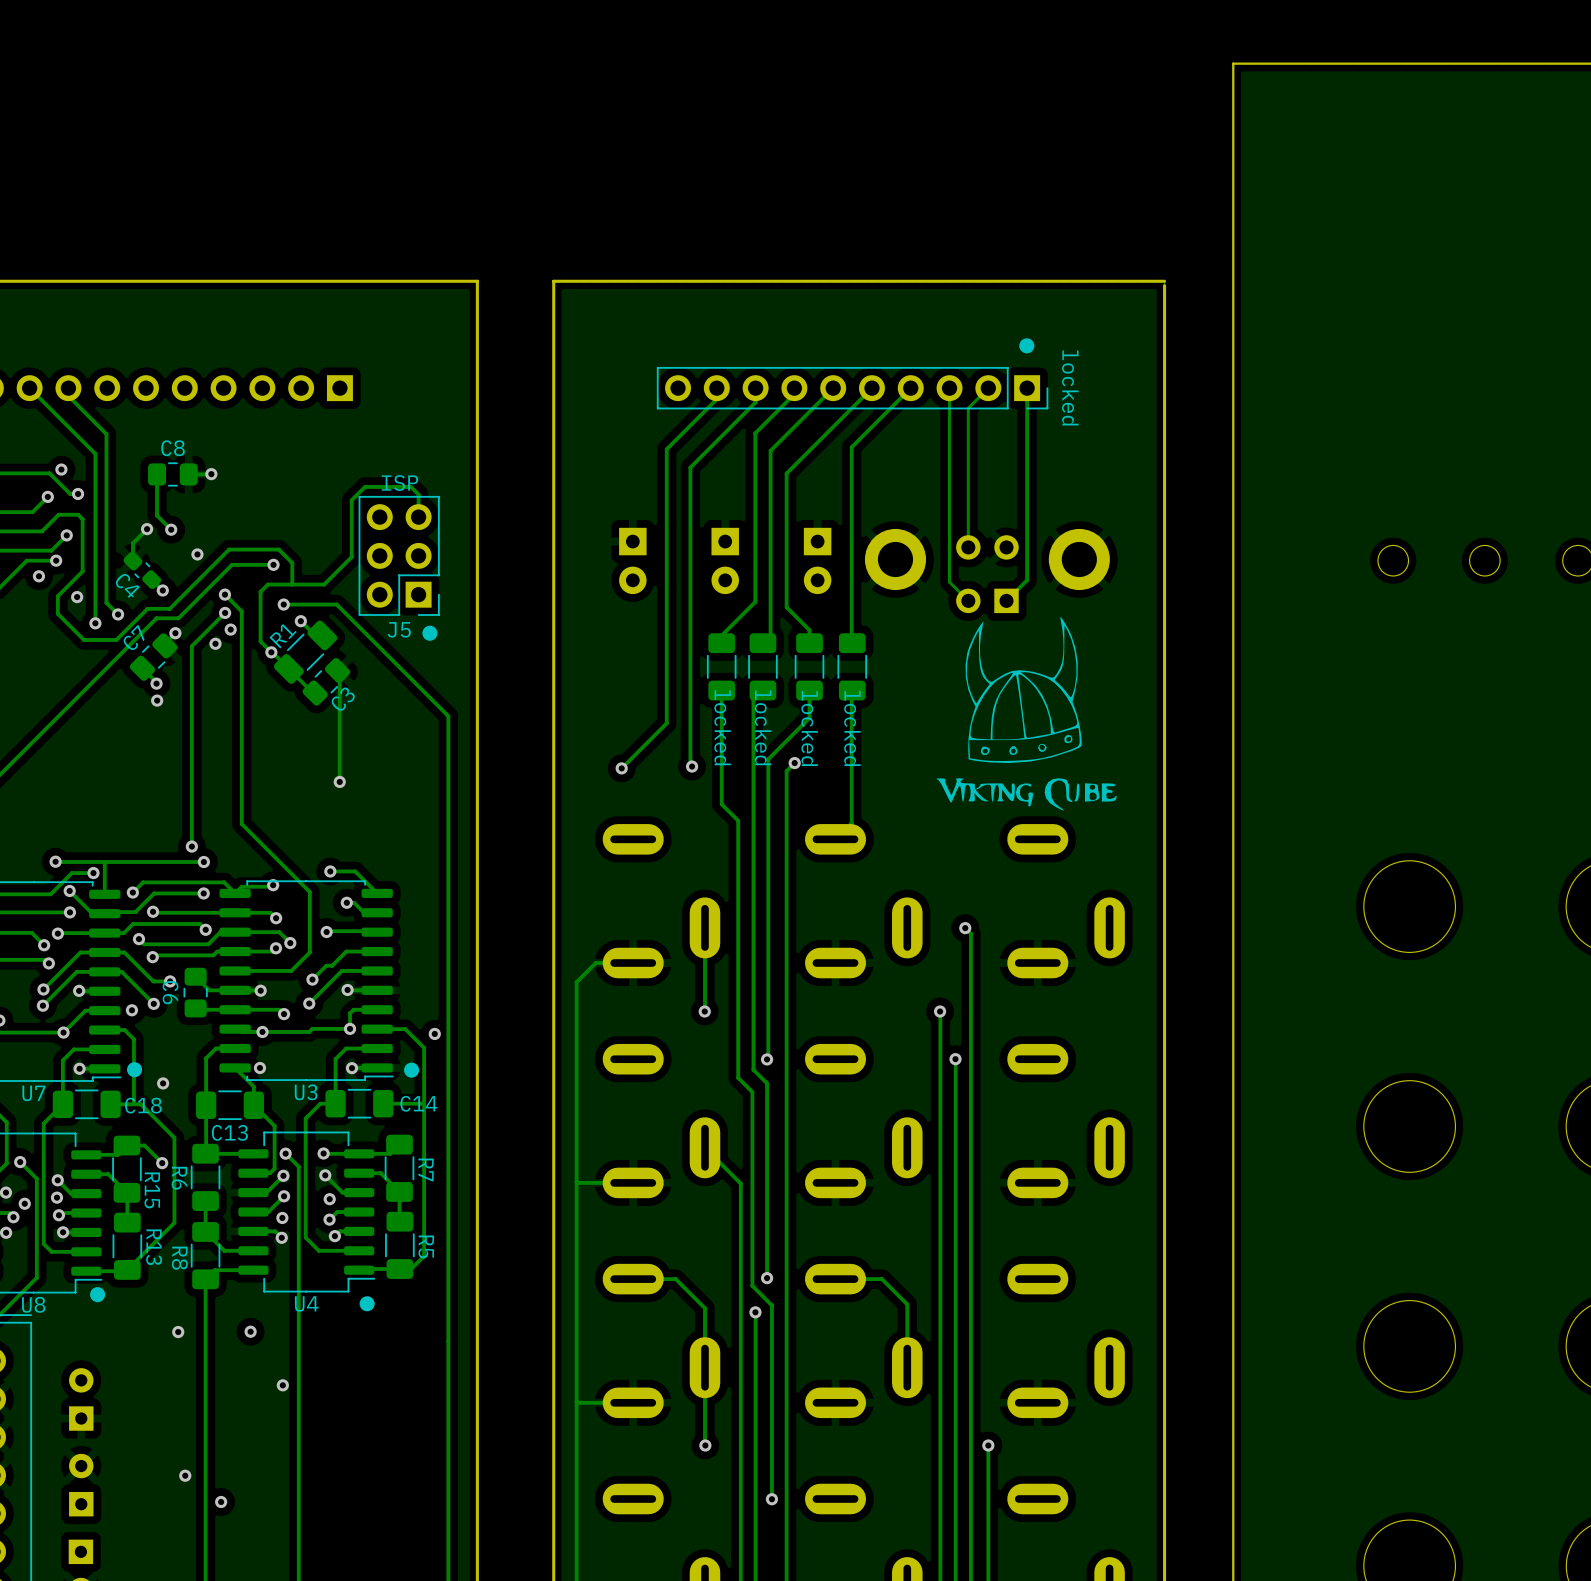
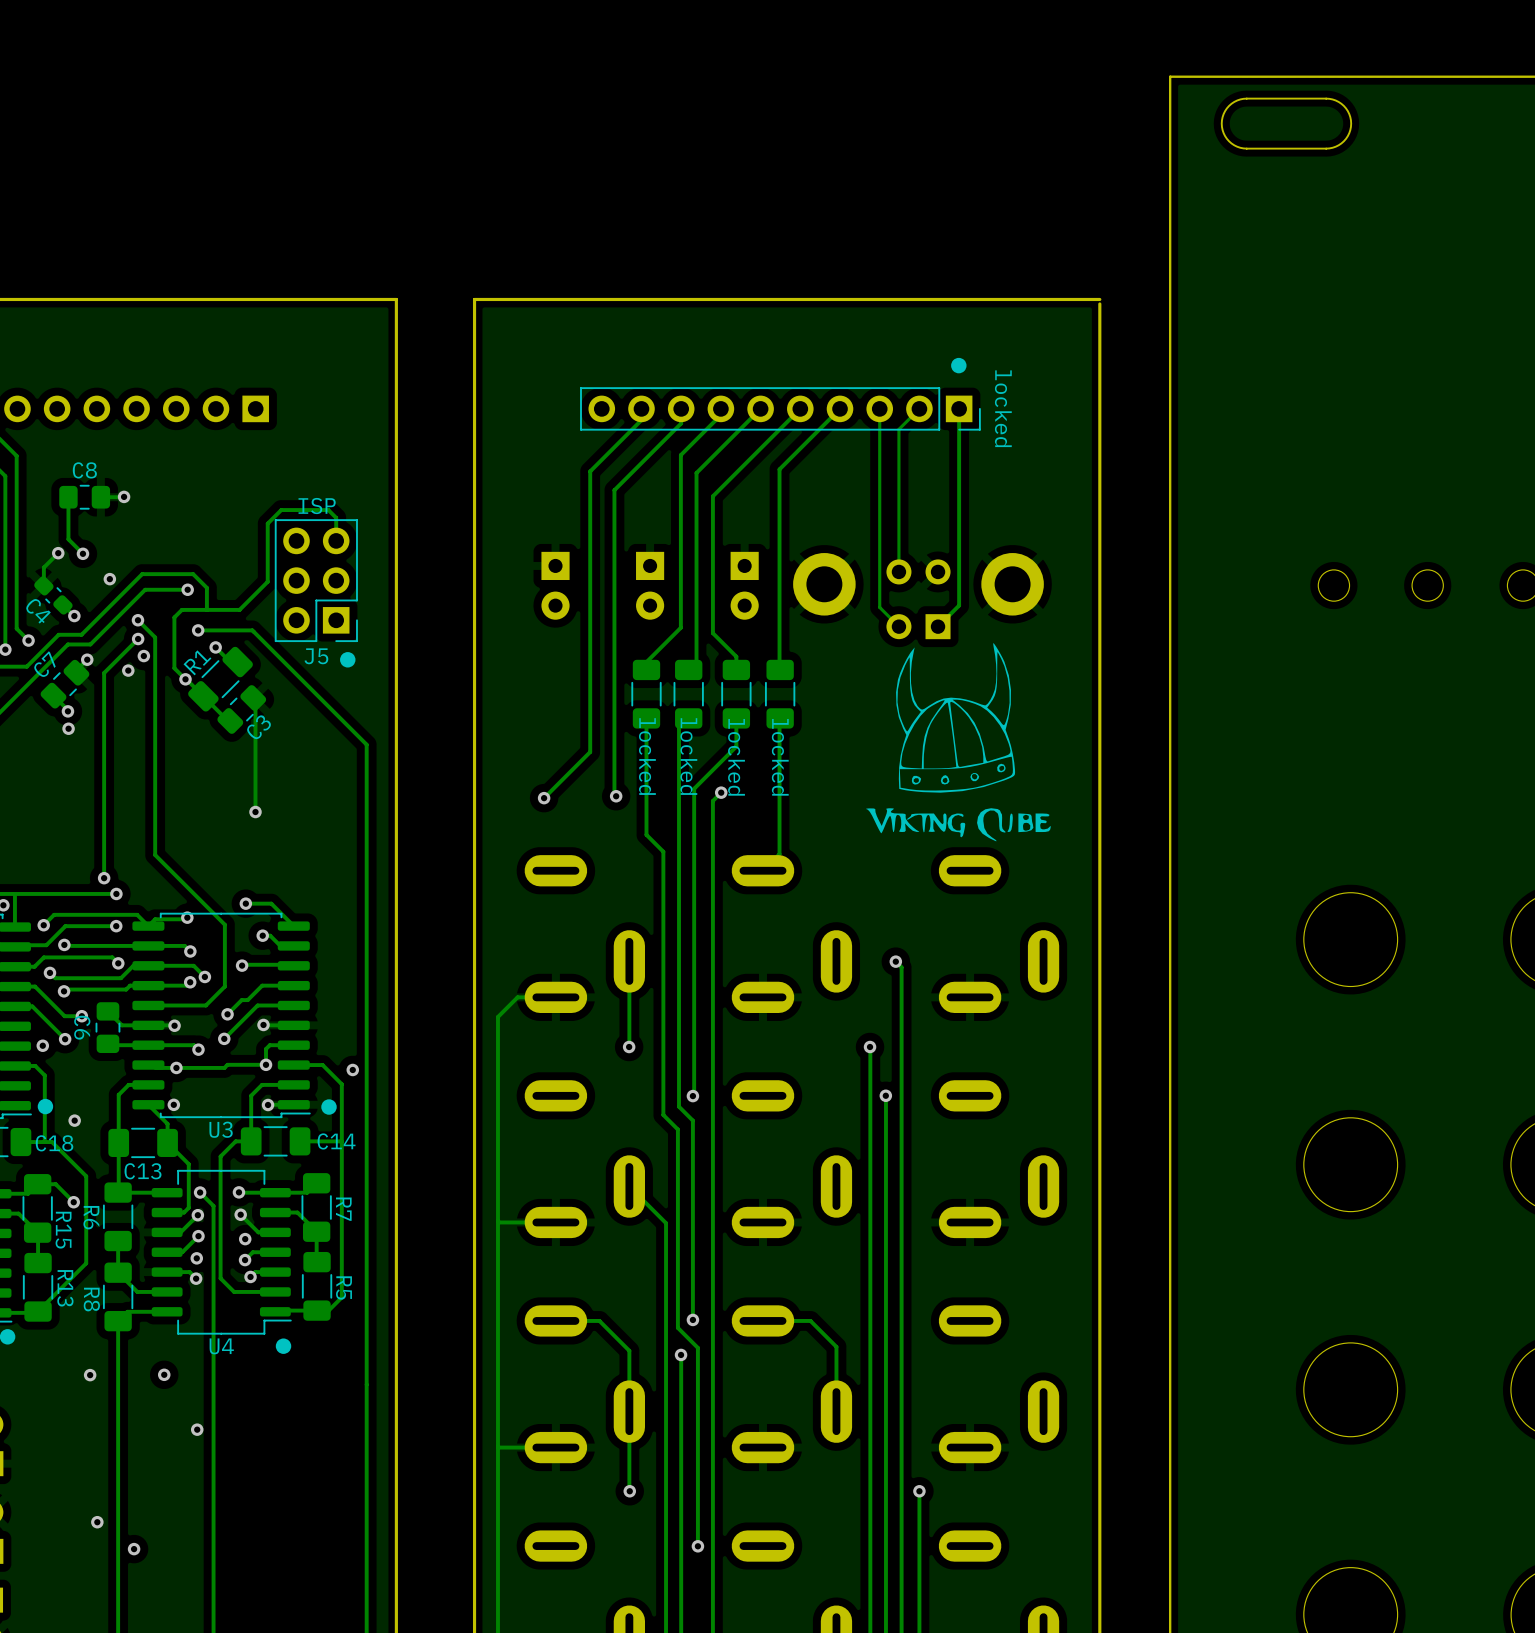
drawing: none -> [1220, 97, 1353, 150]

